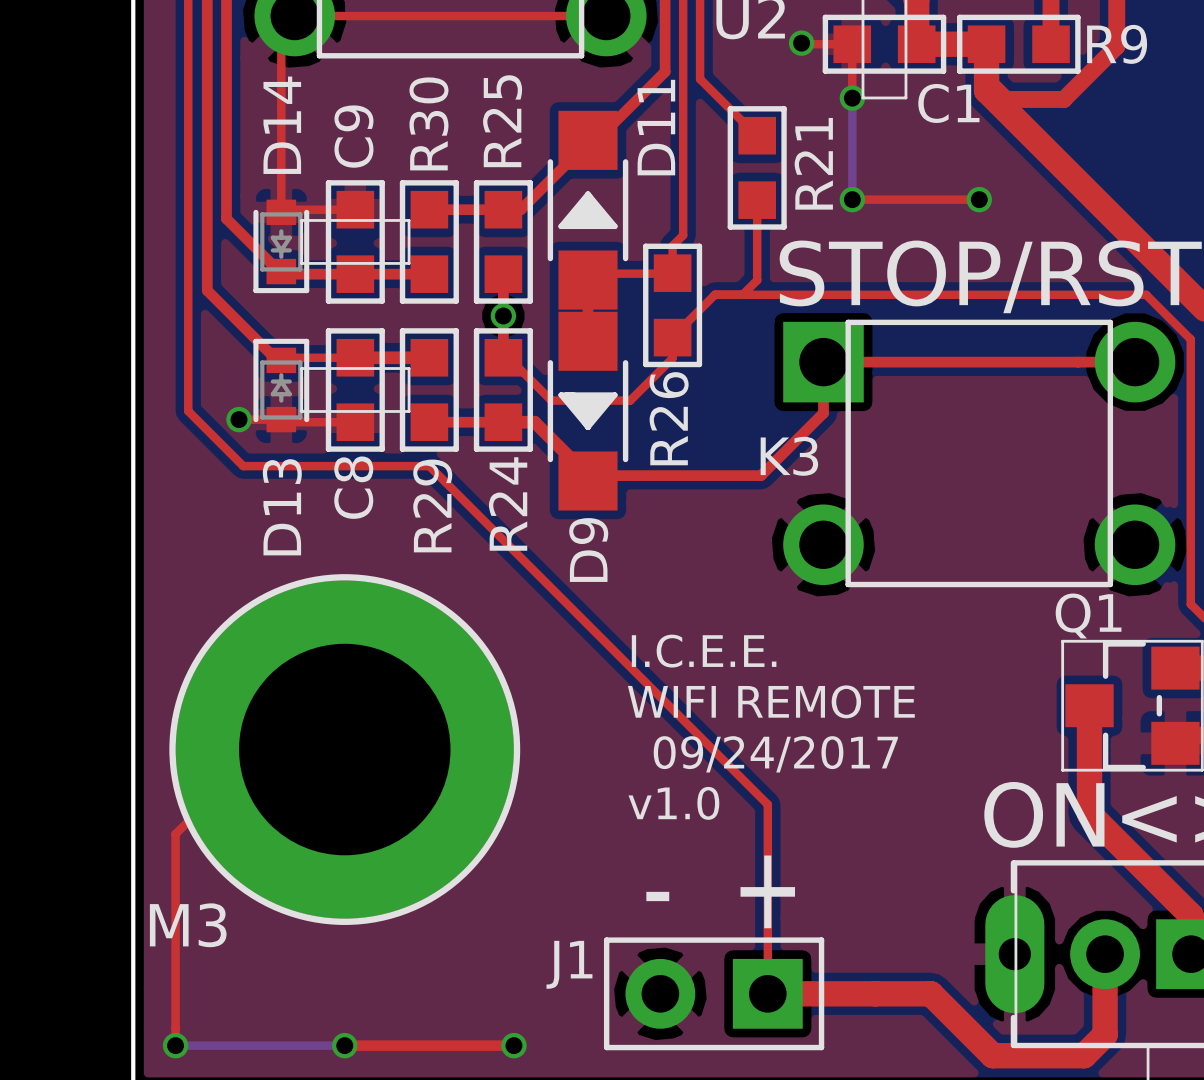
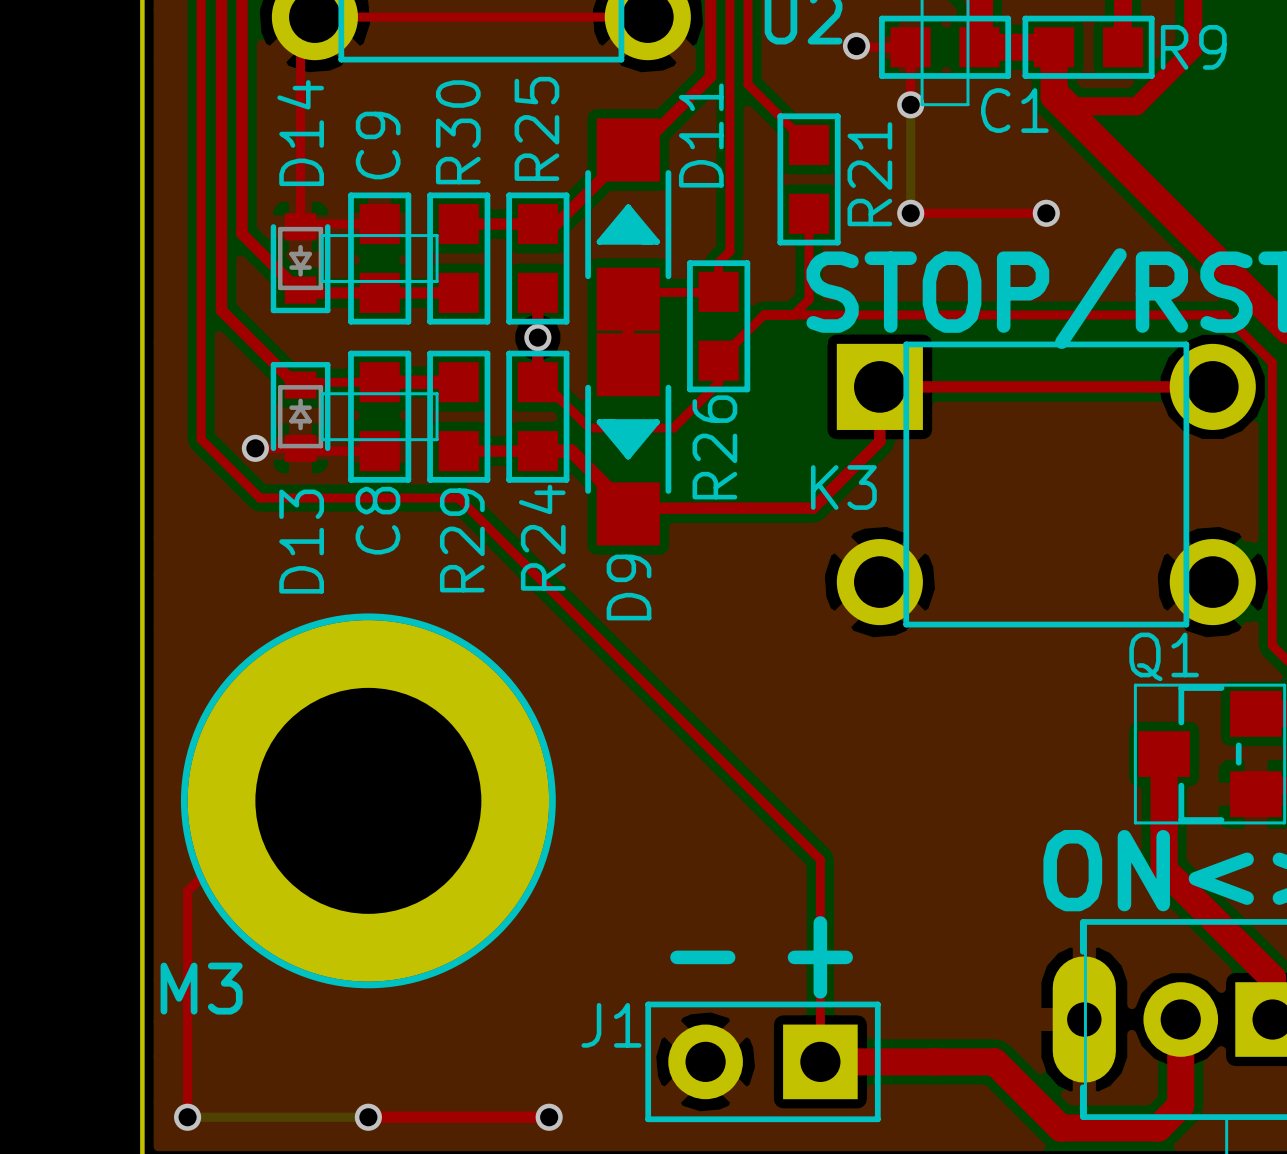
text: I.C.E.E. (704, 651) -> none
text: WIFI REMOTE (771, 701) -> none
text: 09/24/2017 (775, 754) -> none
text: v1.0 (673, 803) -> none

